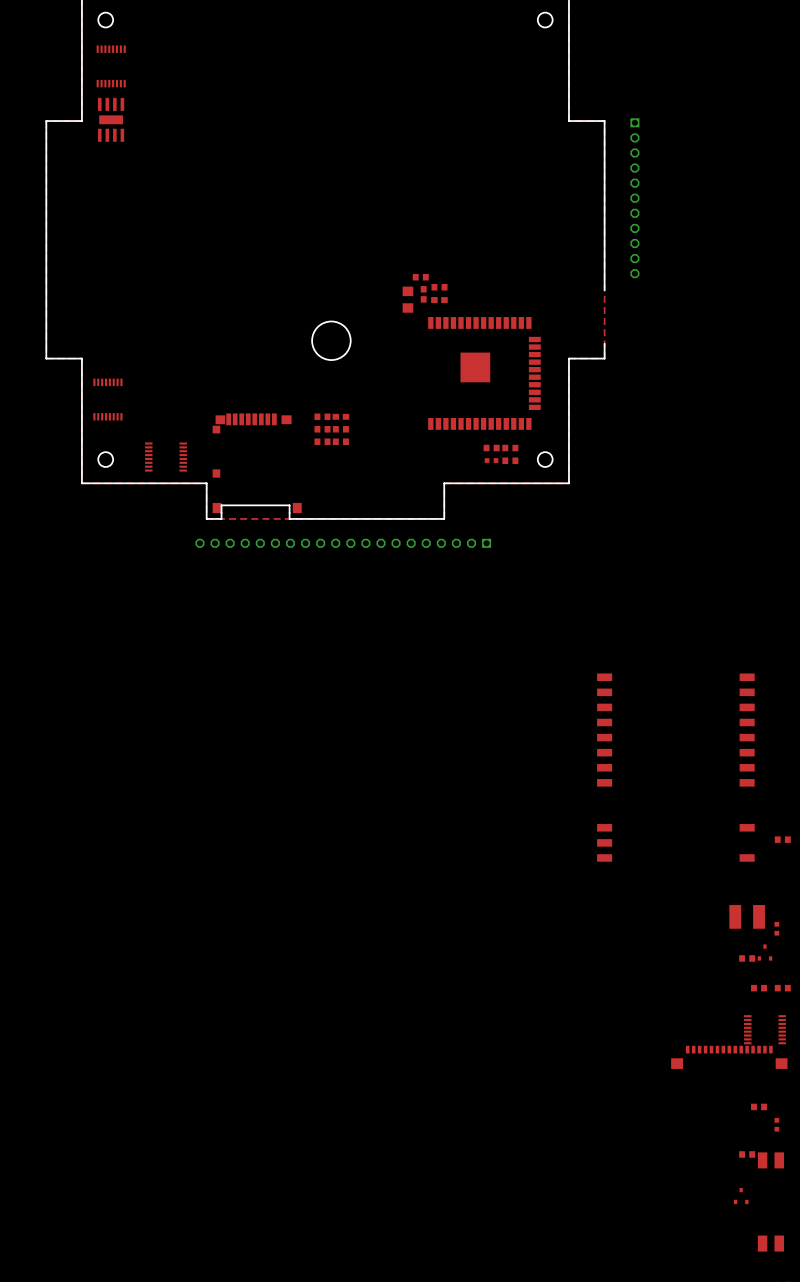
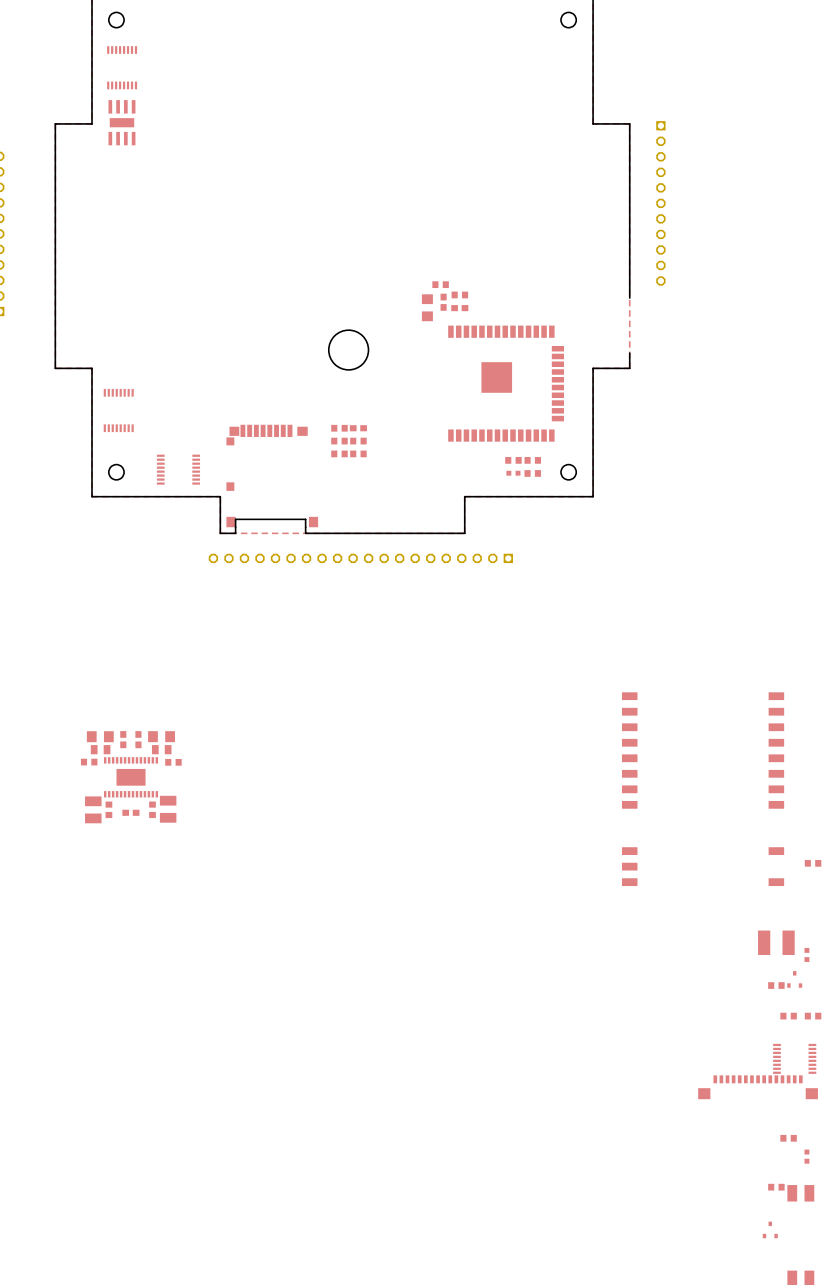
part: none -> (100, 736)
part: none -> (161, 736)
part: none -> (123, 739)
part: none -> (138, 739)
part: none -> (100, 749)
part: none -> (161, 749)
part: none -> (89, 762)
part: none -> (173, 762)
part: none -> (131, 777)
part: none -> (93, 809)
part: none -> (108, 809)
part: none -> (152, 809)
part: none -> (168, 809)
part: none -> (130, 812)

